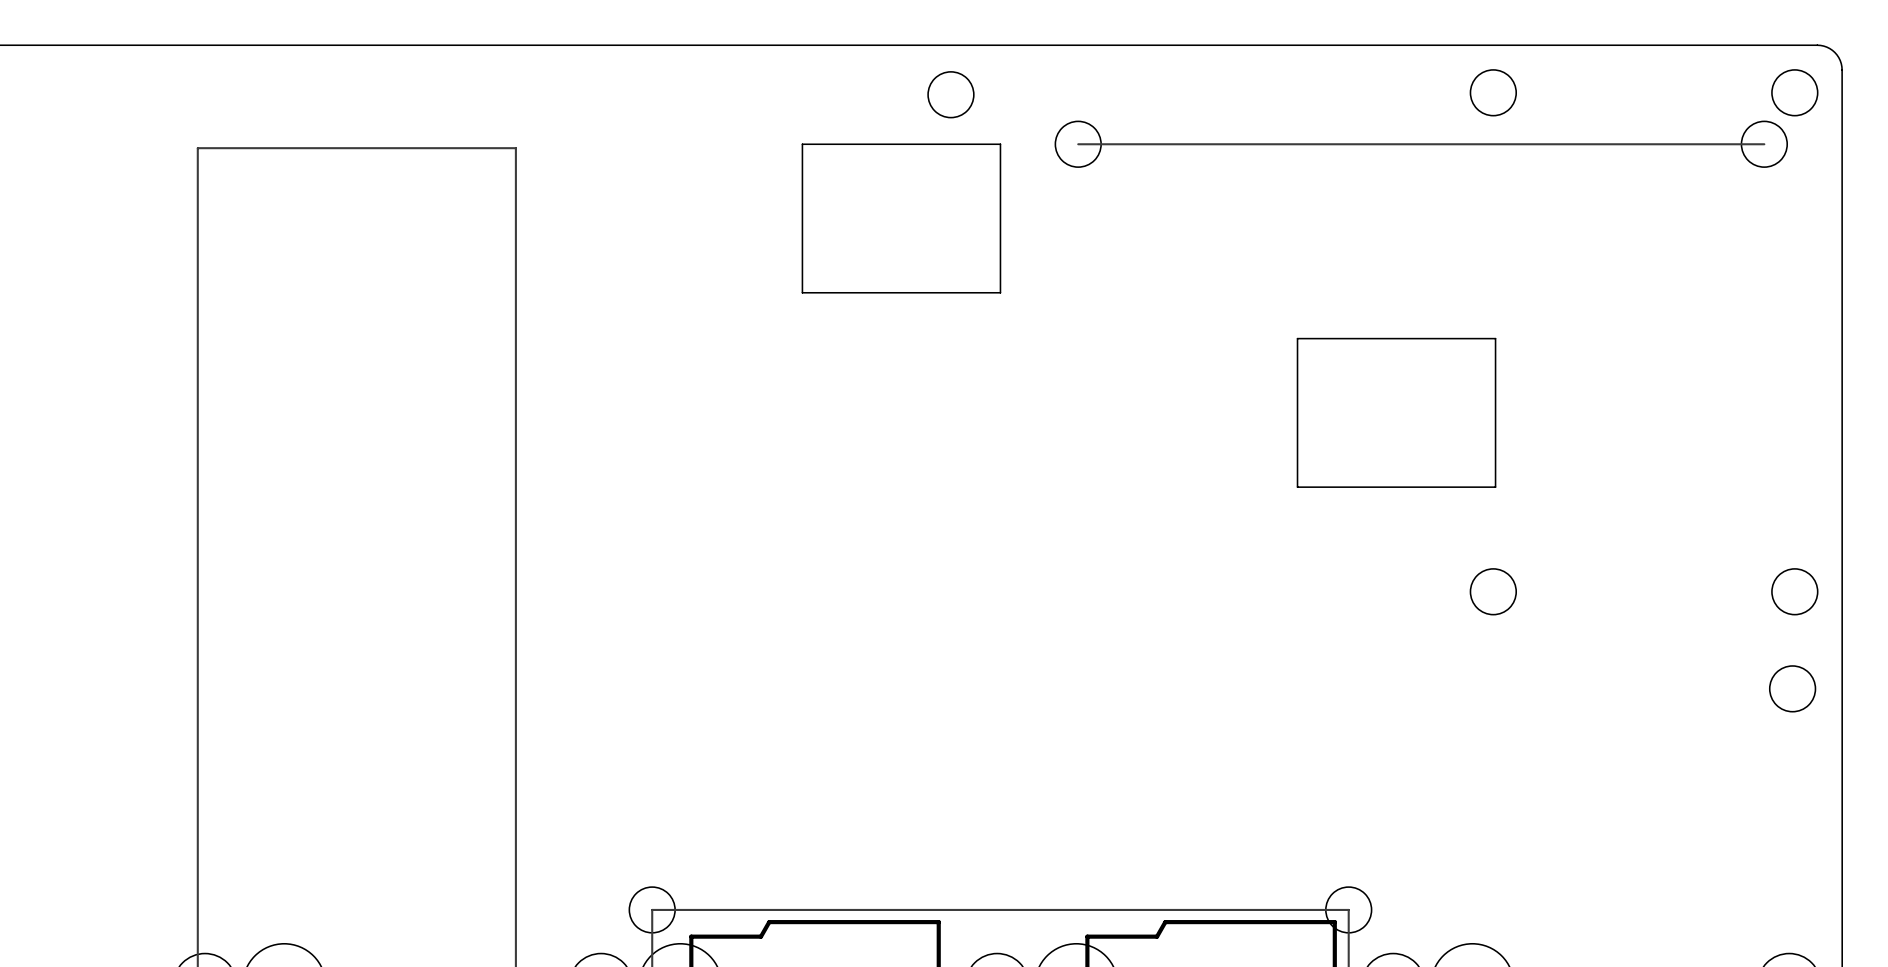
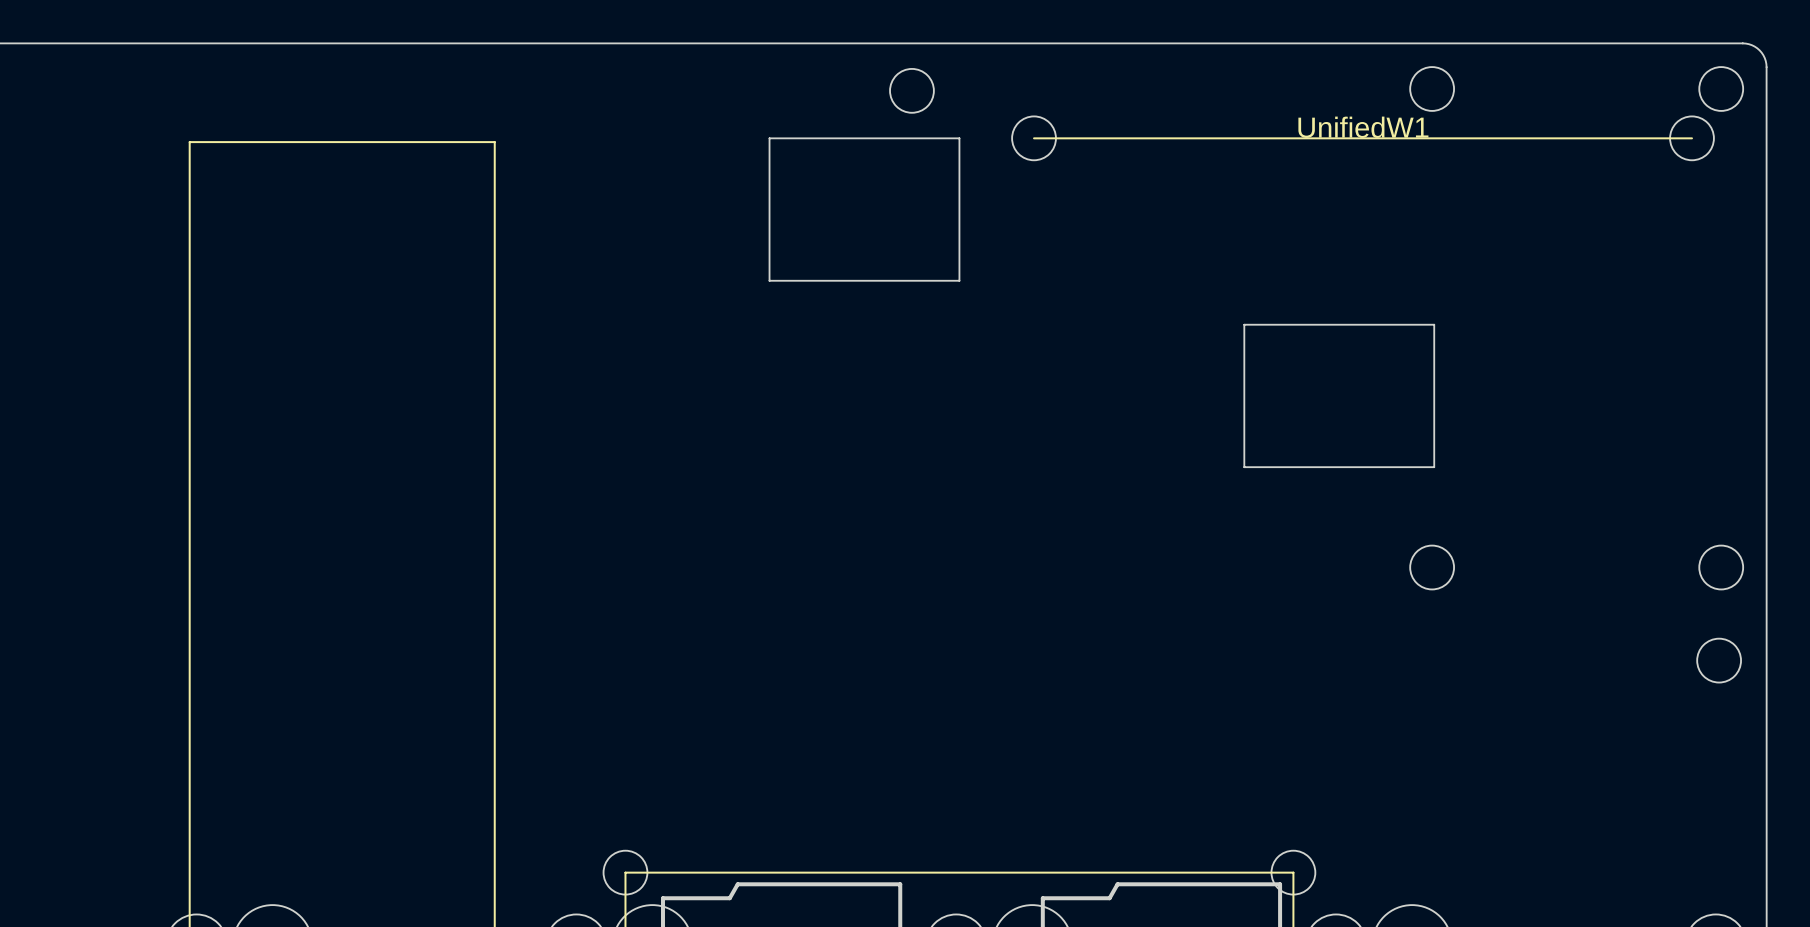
UnifiedW1 name: none -> UnifiedW1 (1363, 127)

